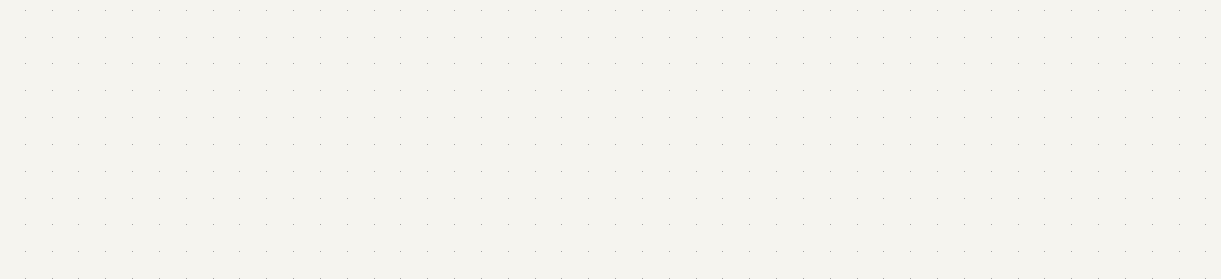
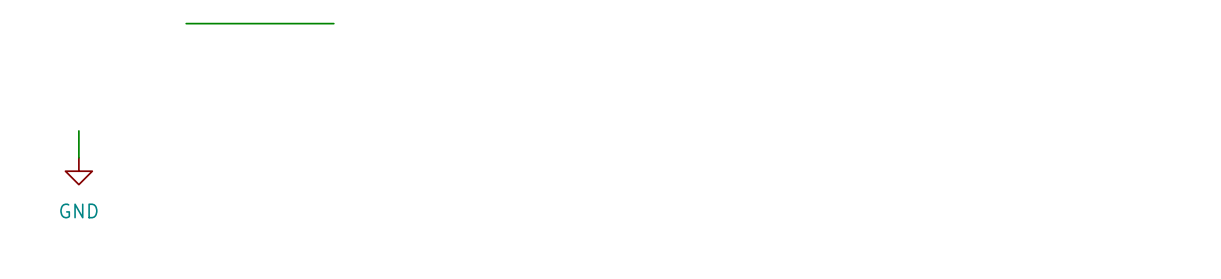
wire: none -> (186, 23) (333, 23)
wire: none -> (78, 130) (78, 157)
power symbol: none -> GND (78, 171)

